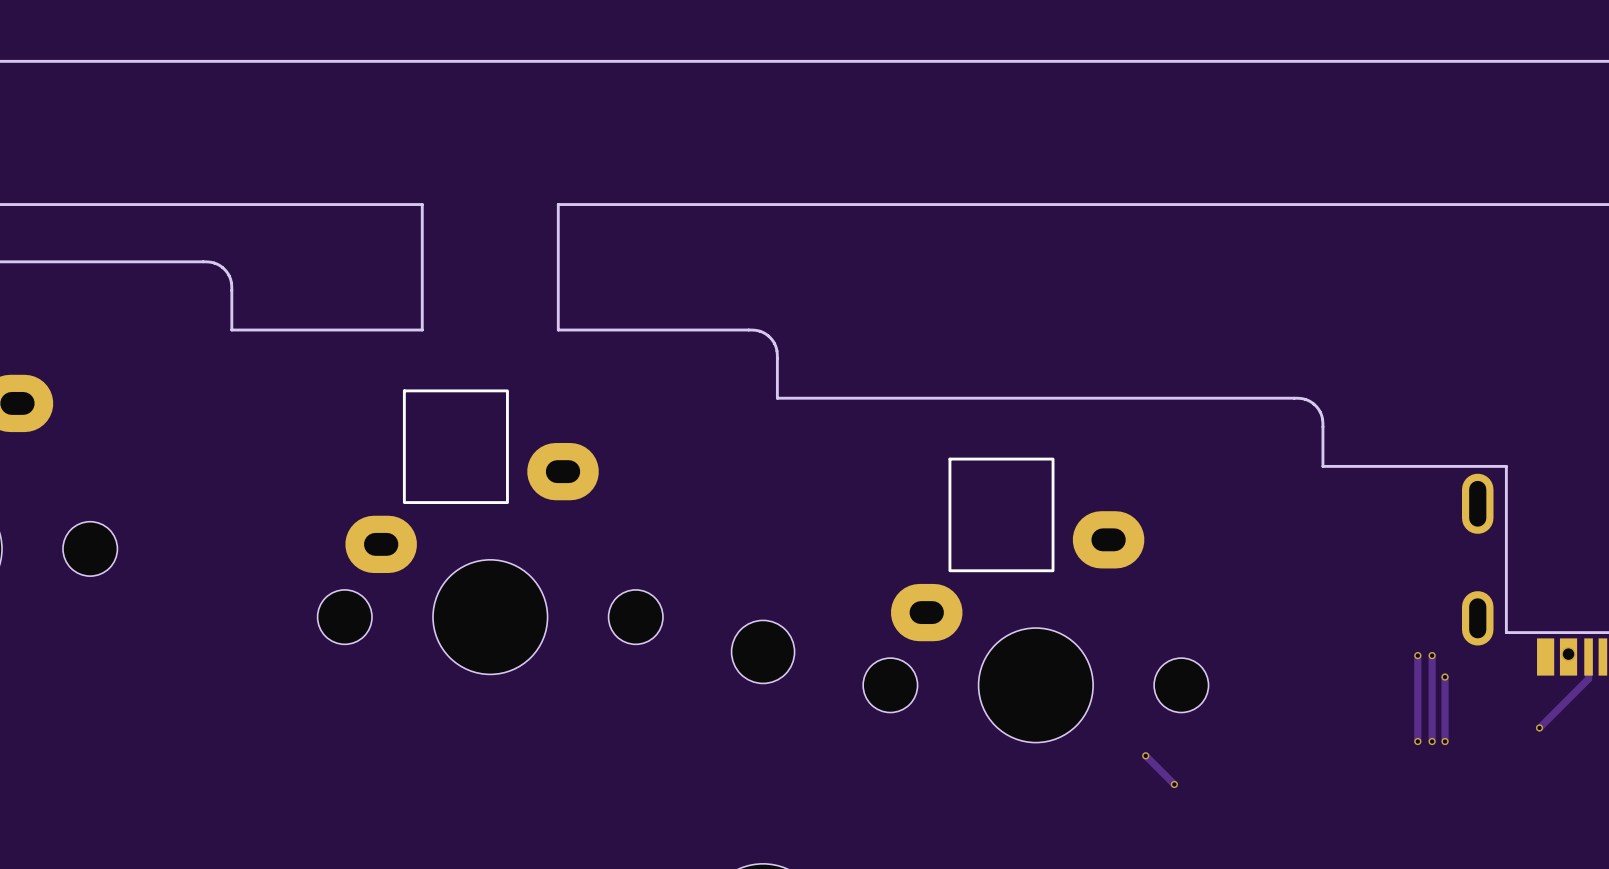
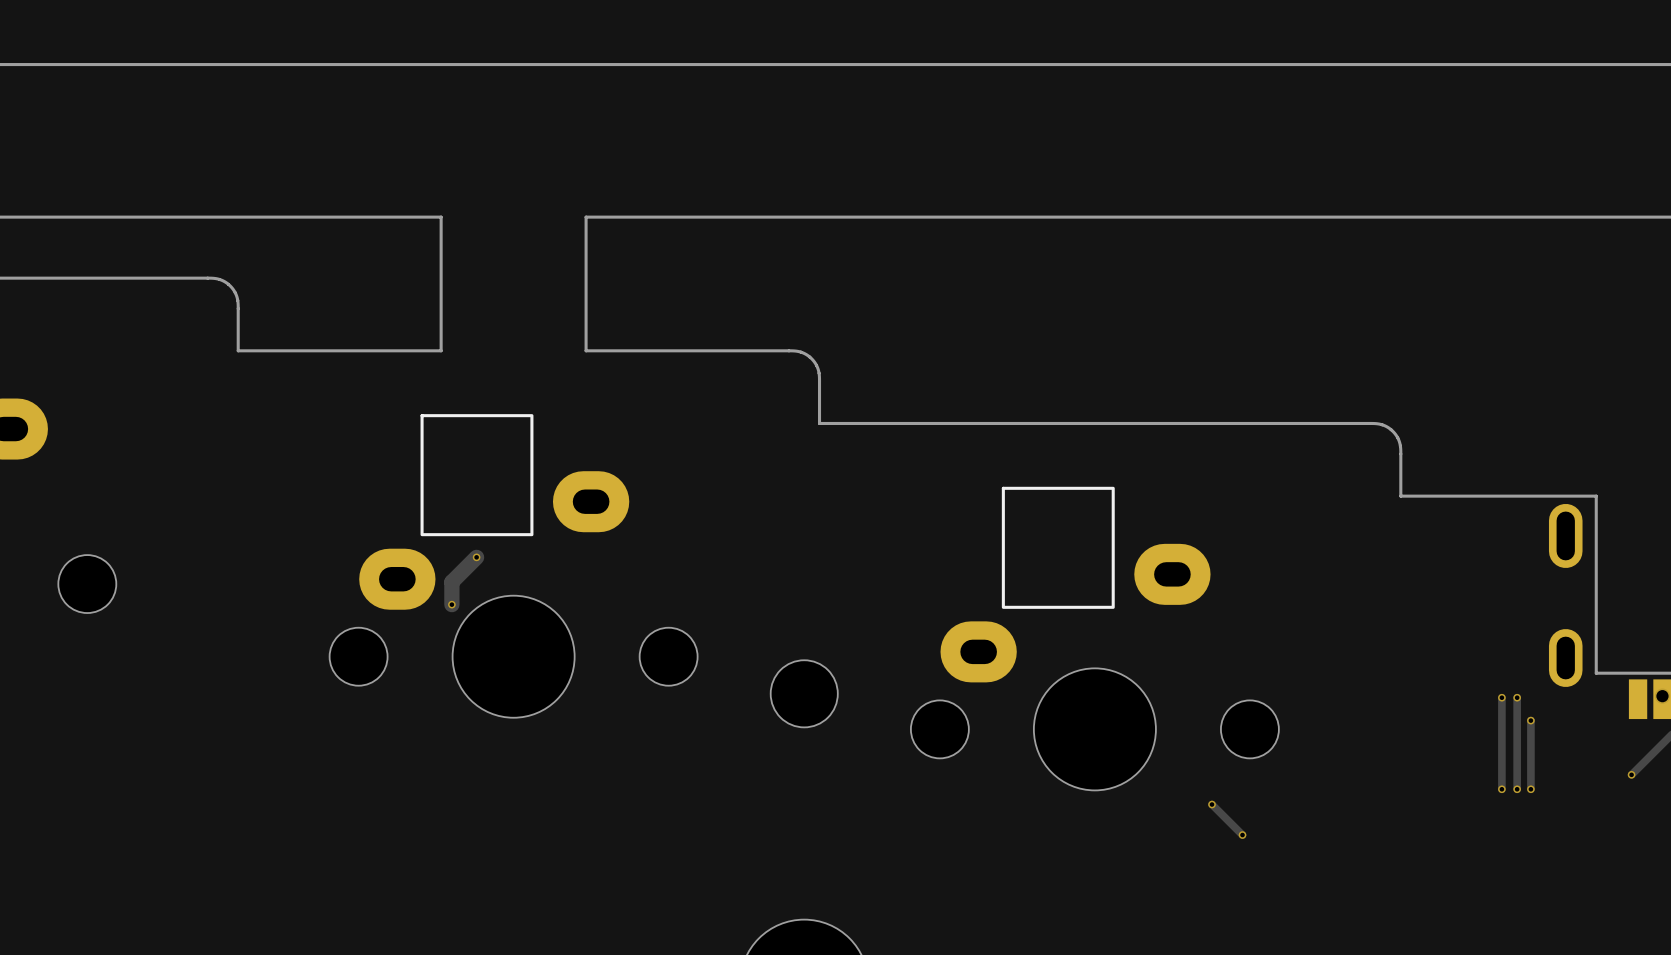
track: none -> (476, 557) (451, 582) (451, 604)
via: none -> (476, 557)
via: none -> (451, 604)

